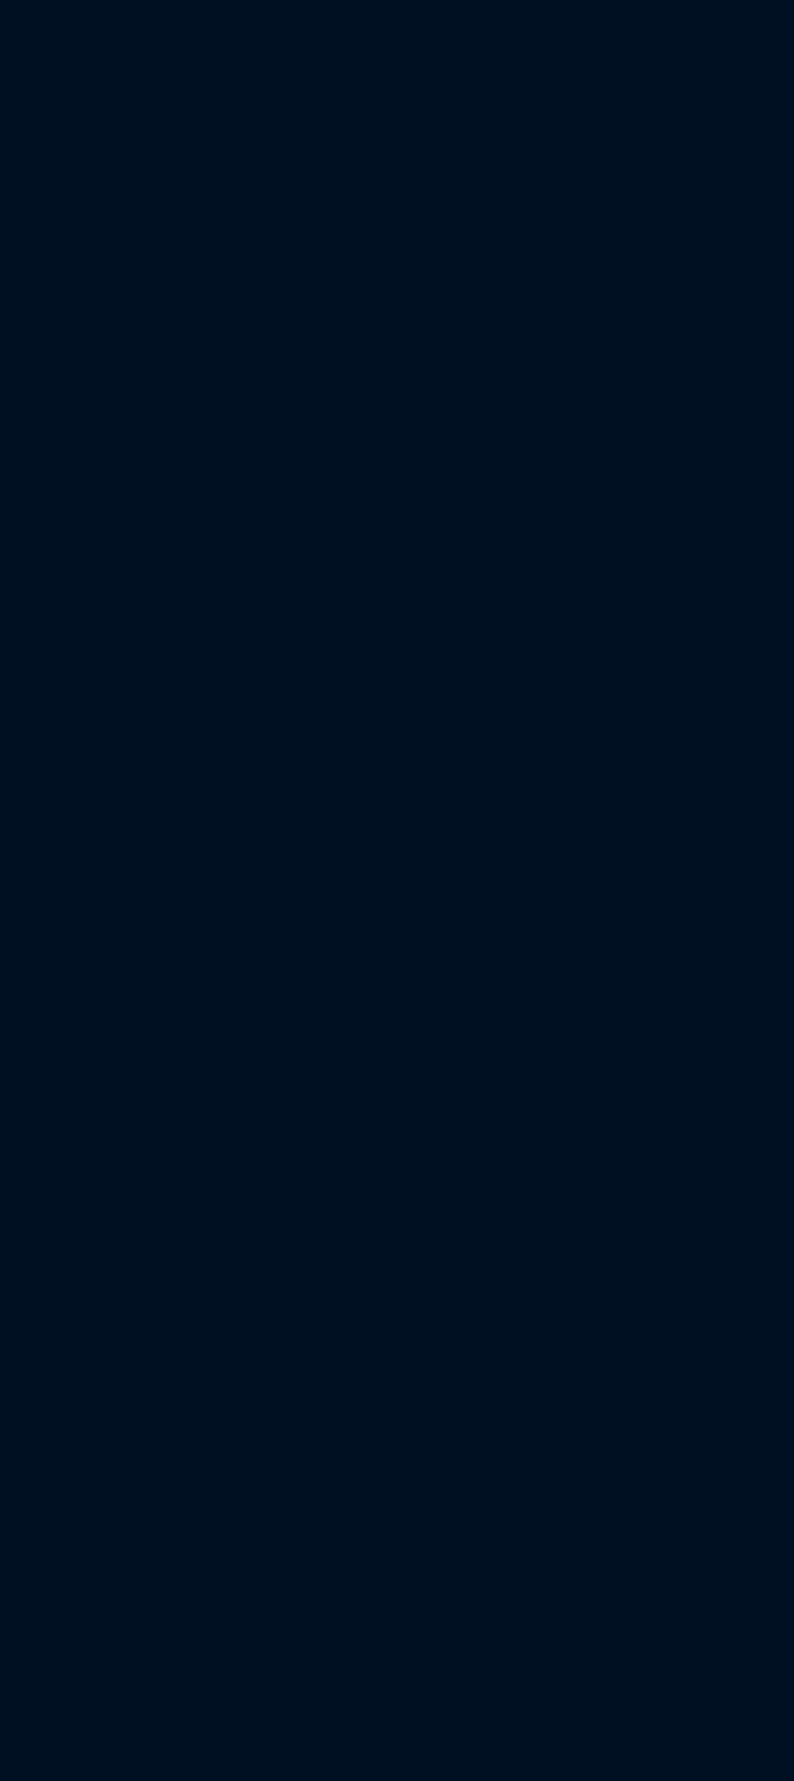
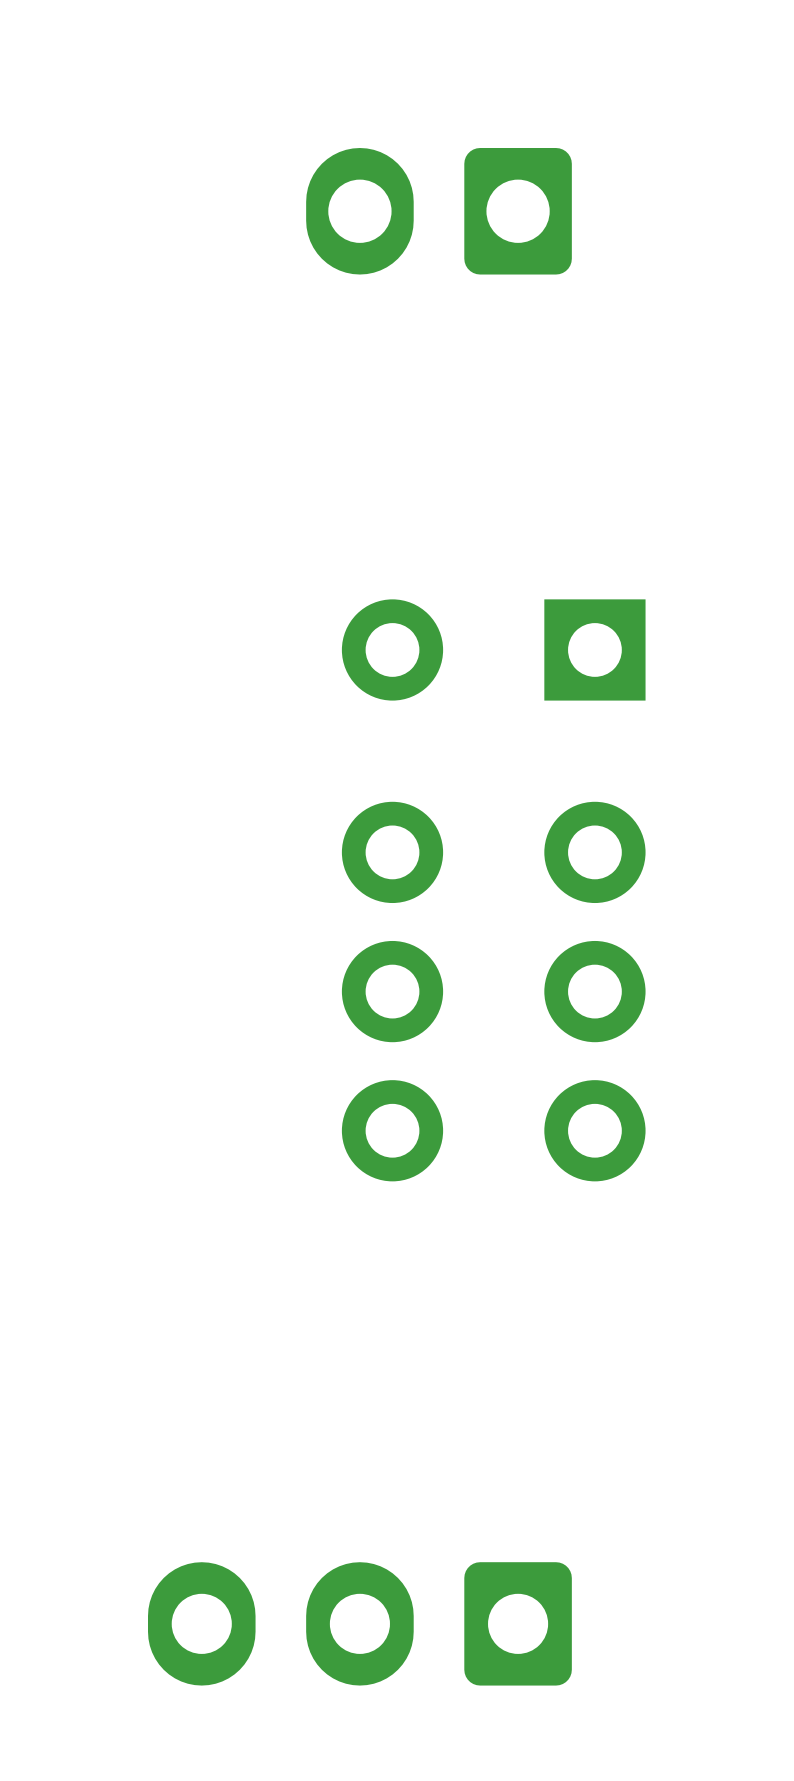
part: none -> (439, 211)
part: none -> (493, 890)
part: none -> (359, 1623)

